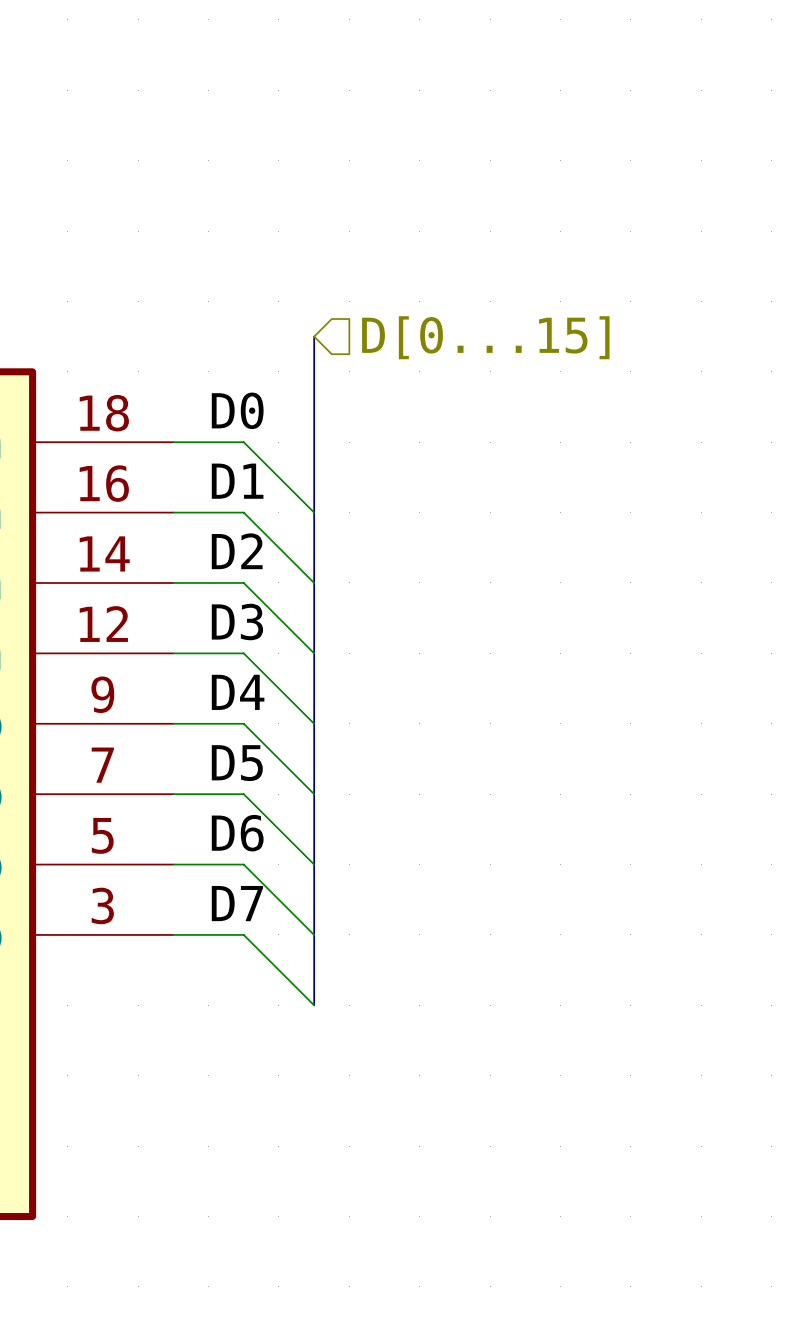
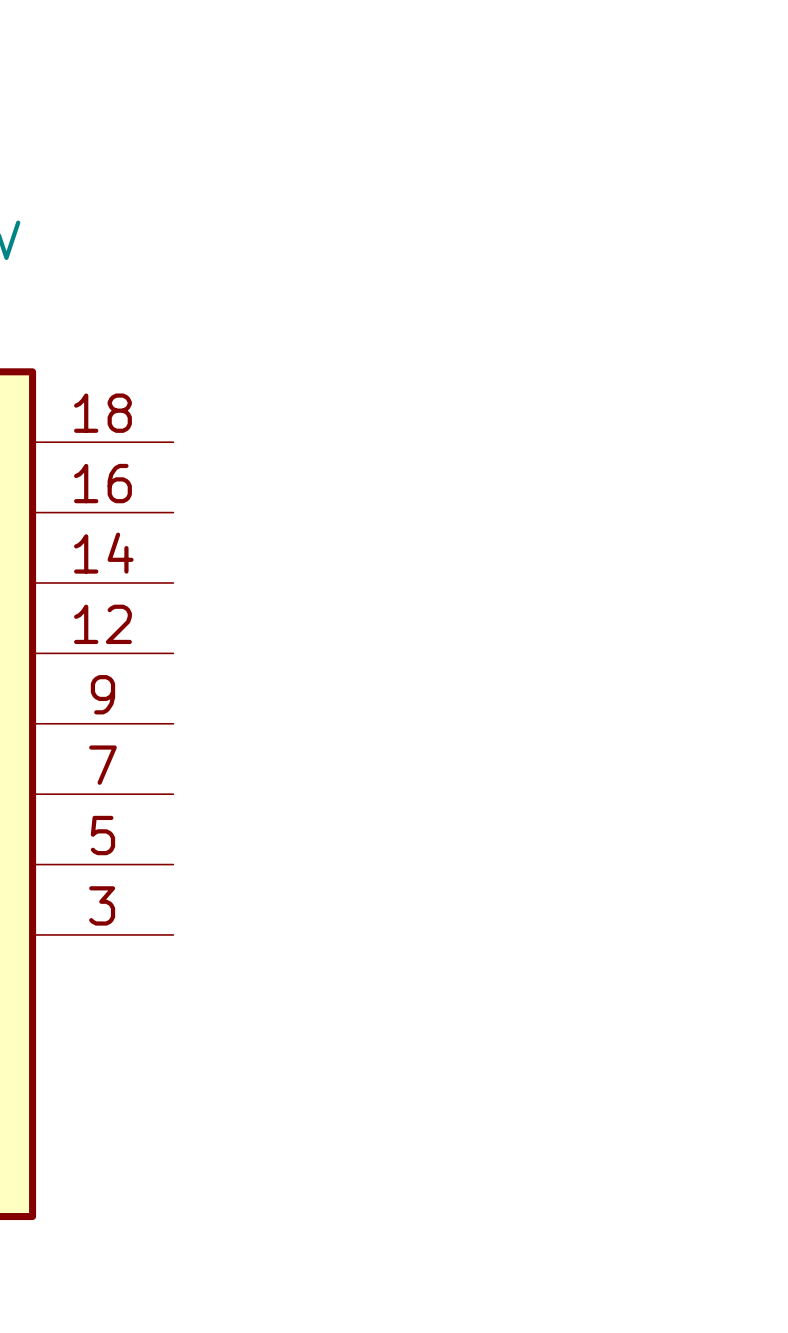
bus: (314, 336) (314, 1005) -> none
hierarchical label: D[0...15] (485, 337) -> none
label: D0 (237, 410) -> none
wire: (173, 442) (243, 442) (314, 512) -> none
label: D1 (237, 481) -> none
wire: (173, 512) (243, 512) (314, 582) -> none
label: D2 (237, 551) -> none
wire: (173, 582) (243, 582) (314, 653) -> none
label: D3 (237, 622) -> none
wire: (173, 653) (243, 653) (314, 723) -> none
label: D4 (238, 692) -> none
wire: (173, 723) (243, 723) (314, 794) -> none
label: D5 (237, 763) -> none
wire: (173, 794) (243, 794) (314, 864) -> none
label: D6 (237, 833) -> none
wire: (173, 864) (243, 864) (314, 934) -> none
label: D7 (237, 903) -> none
wire: (173, 934) (243, 934) (314, 1005) -> none

